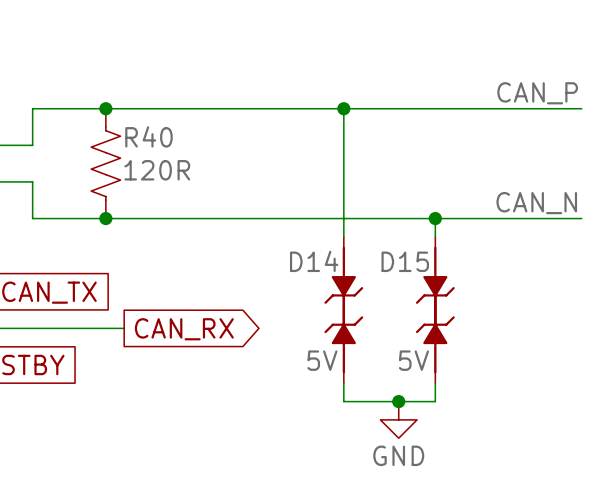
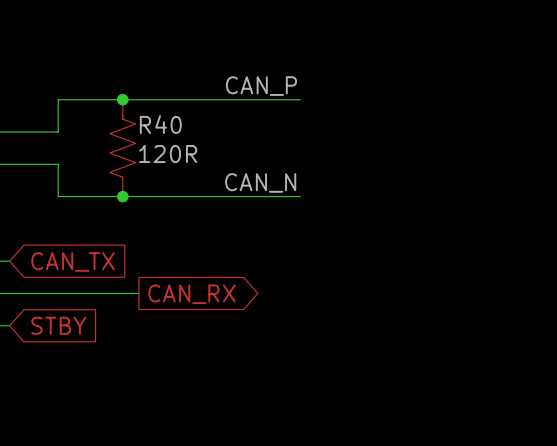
label position: CAN_P (537, 93) -> CAN_P (261, 86)
wire: (307, 108) (581, 108) -> none
wire: (343, 108) (343, 236) -> none
junction: (343, 108) -> none
label position: CAN_N (536, 203) -> CAN_N (260, 182)
wire: (307, 218) (581, 218) -> none
wire: (435, 218) (435, 236) -> none
junction: (435, 218) -> none
D14: 5V (343, 310) -> none
D15: 5V (435, 310) -> none
wire: (343, 383) (343, 401) (435, 401) (435, 383) -> none
junction: (398, 401) -> none
power symbol: GND (398, 419) -> none

